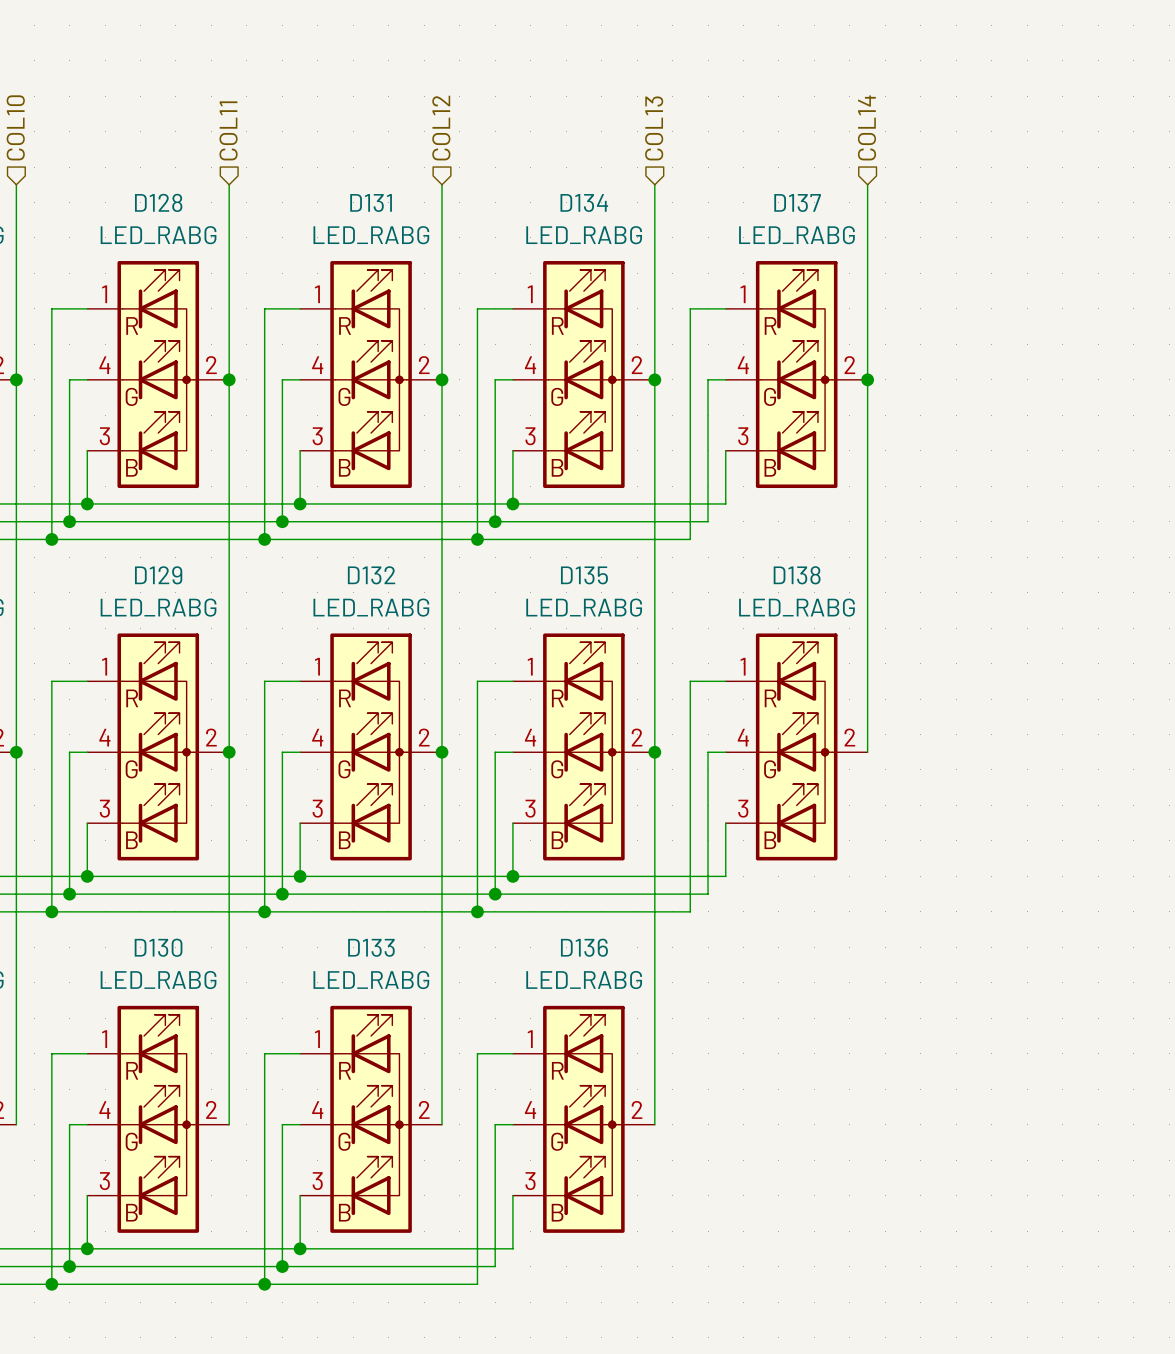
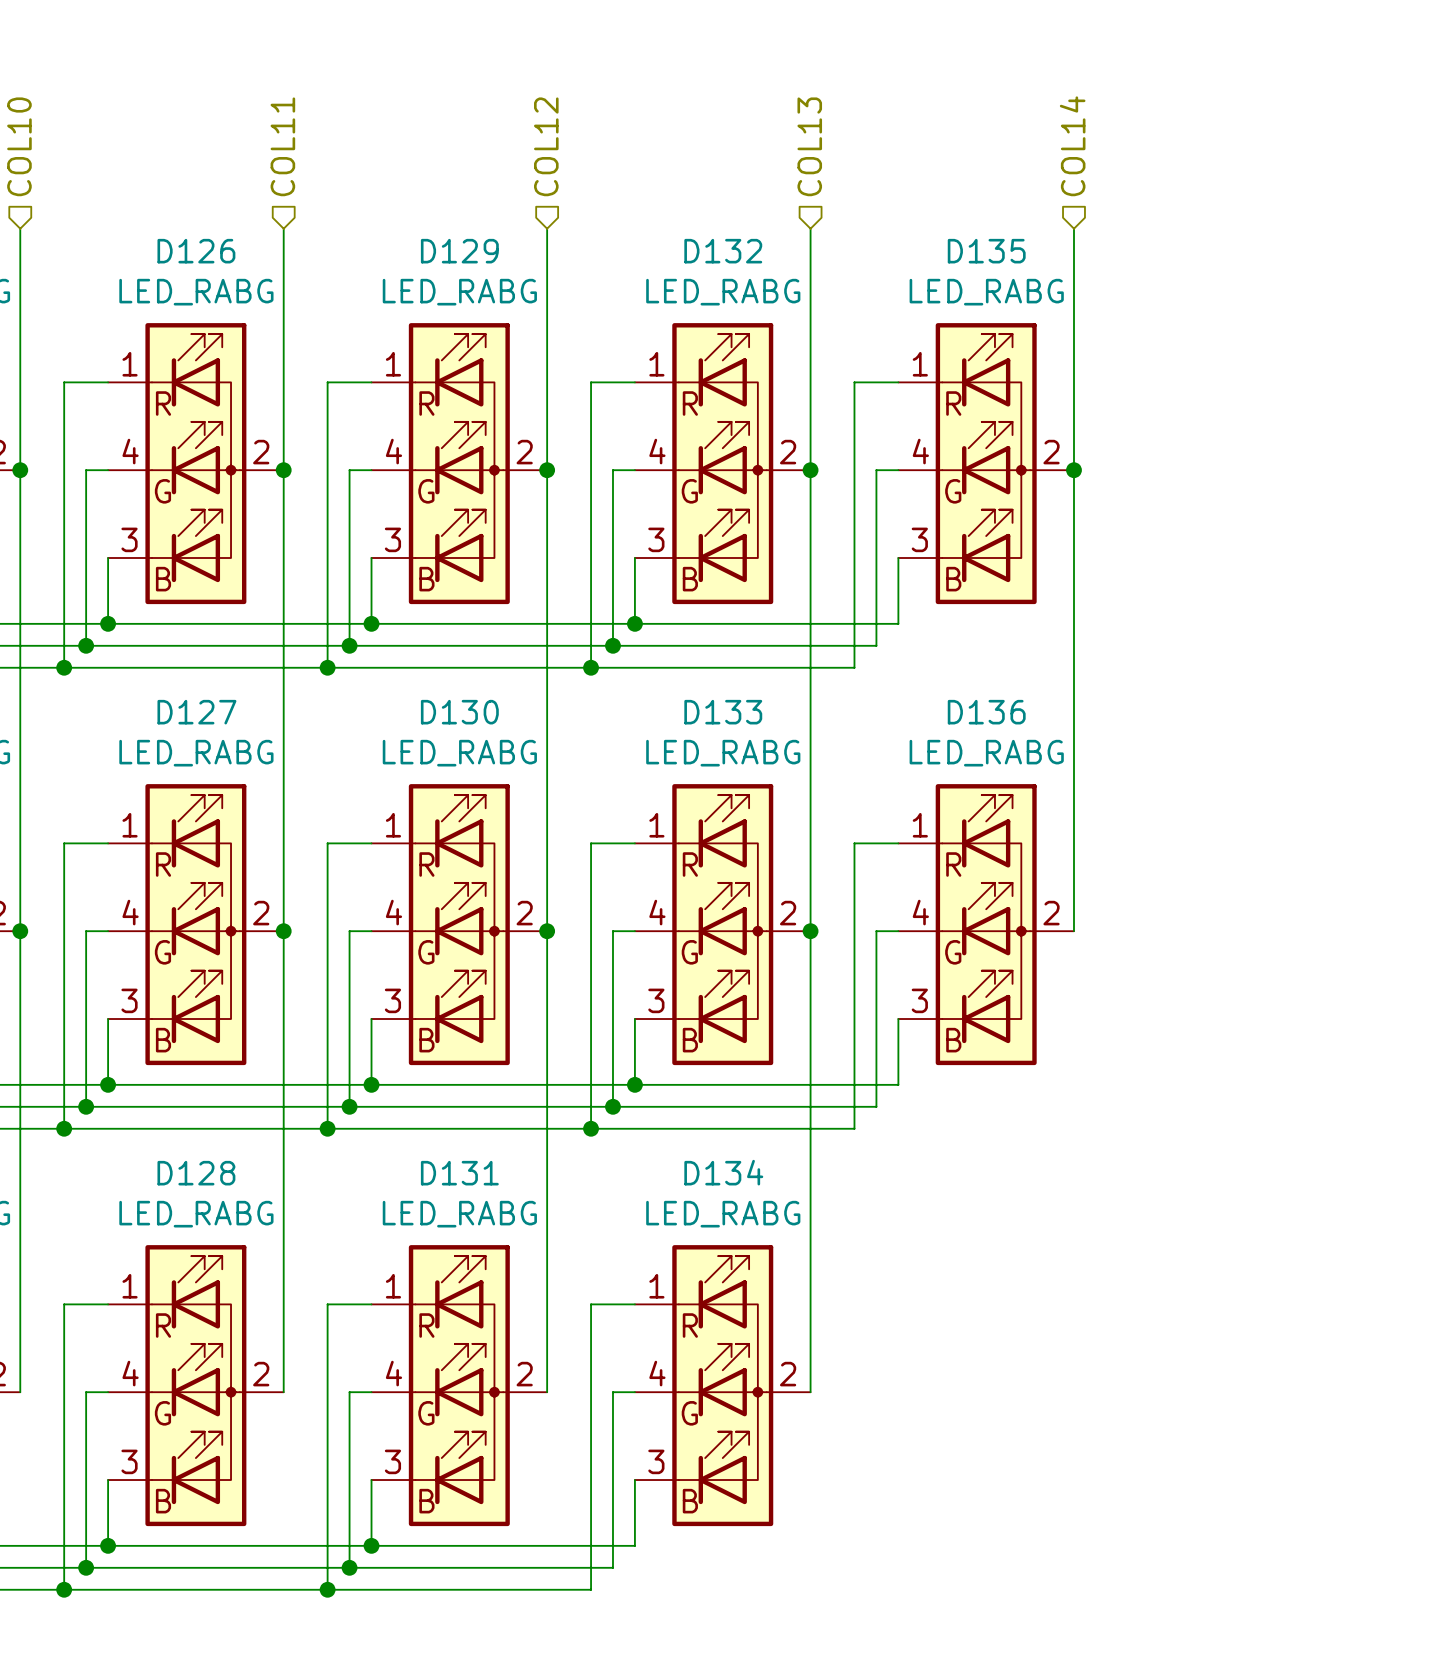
D128 name: D128 (158, 202) -> D126 (196, 251)
D131 name: D131 (371, 203) -> D129 (459, 251)
D134 name: D134 (584, 203) -> D132 (723, 251)
D137 name: D137 (797, 203) -> D135 (986, 251)
D129 name: D129 (158, 575) -> D127 (196, 712)
D132 name: D132 (371, 575) -> D130 (459, 712)
D135 name: D135 (584, 575) -> D133 (723, 712)
D138 name: D138 (797, 575) -> D136 (986, 712)
D130 name: D130 (158, 947) -> D128 (196, 1173)
D133 name: D133 (371, 947) -> D131 (459, 1173)
D136 name: D136 (584, 947) -> D134 (723, 1172)

